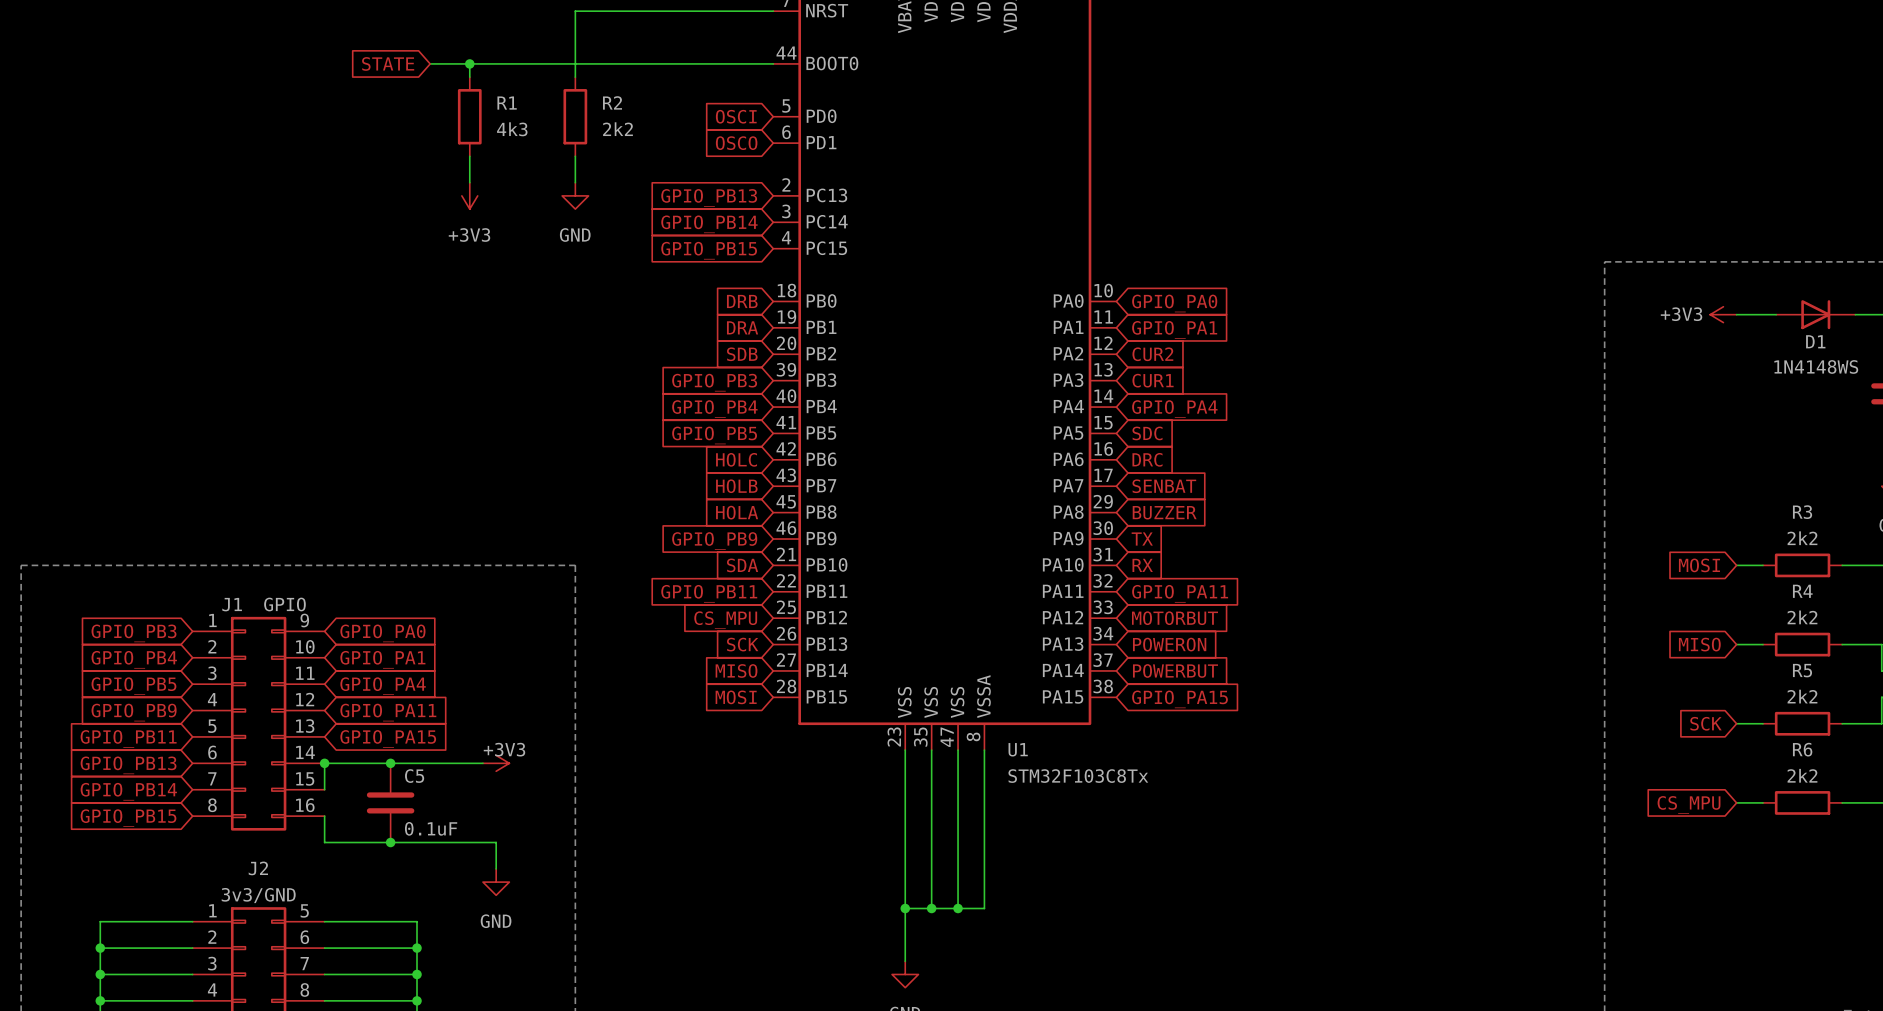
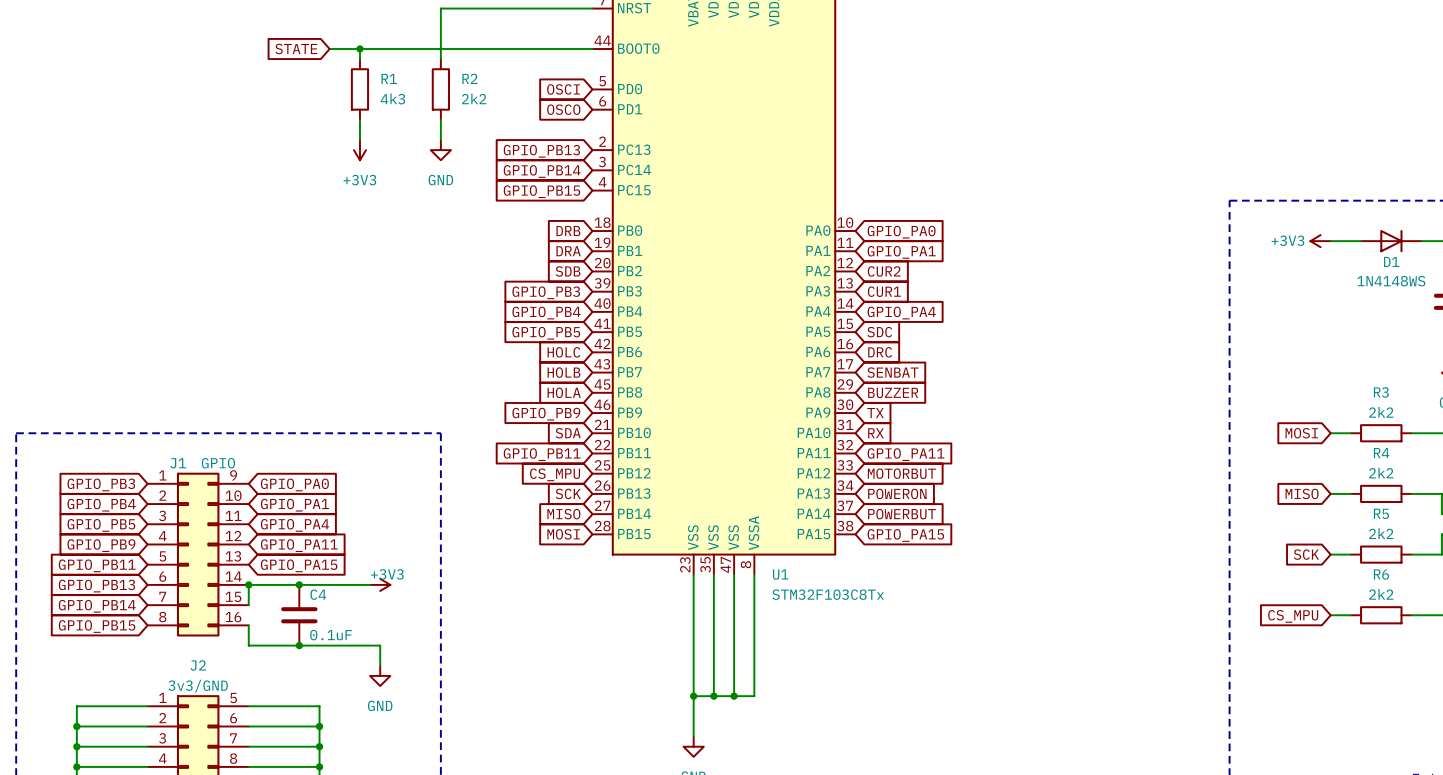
C5 name: C5 (414, 776) -> C4 (318, 594)

